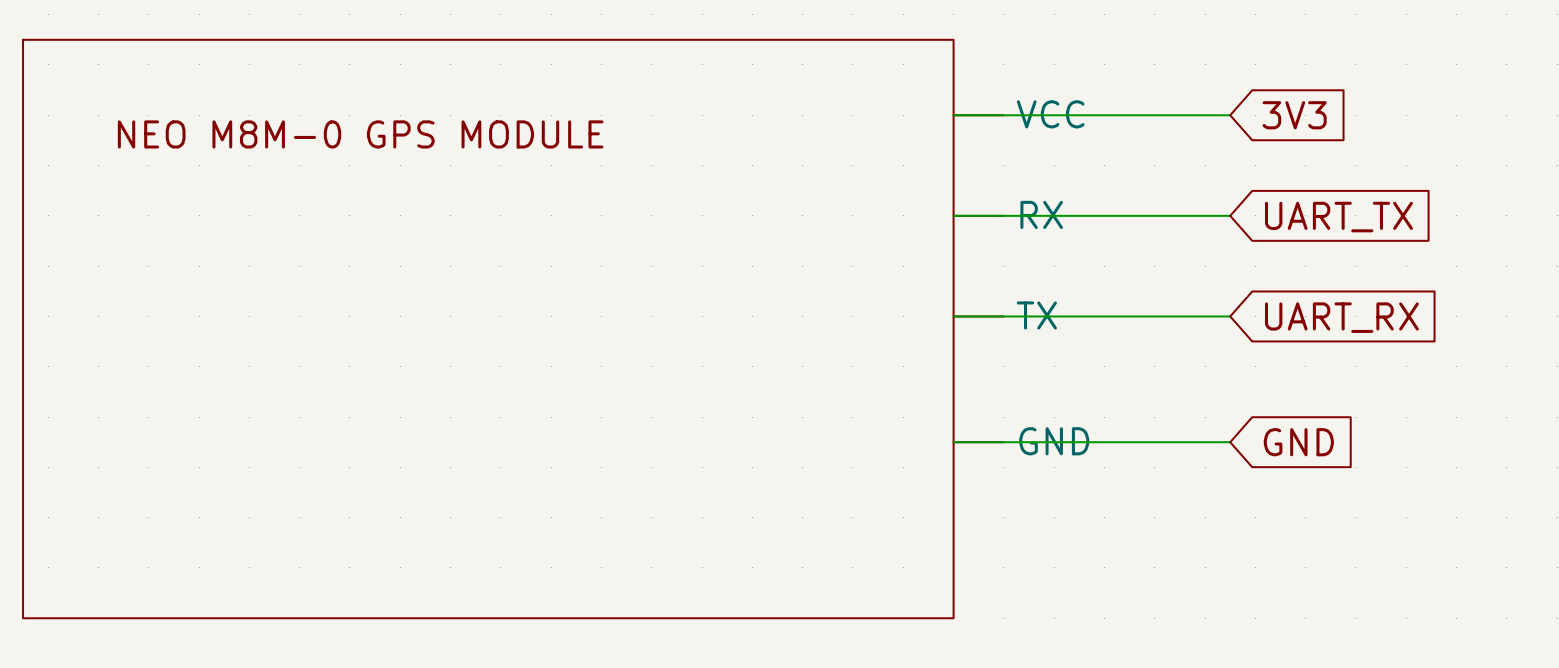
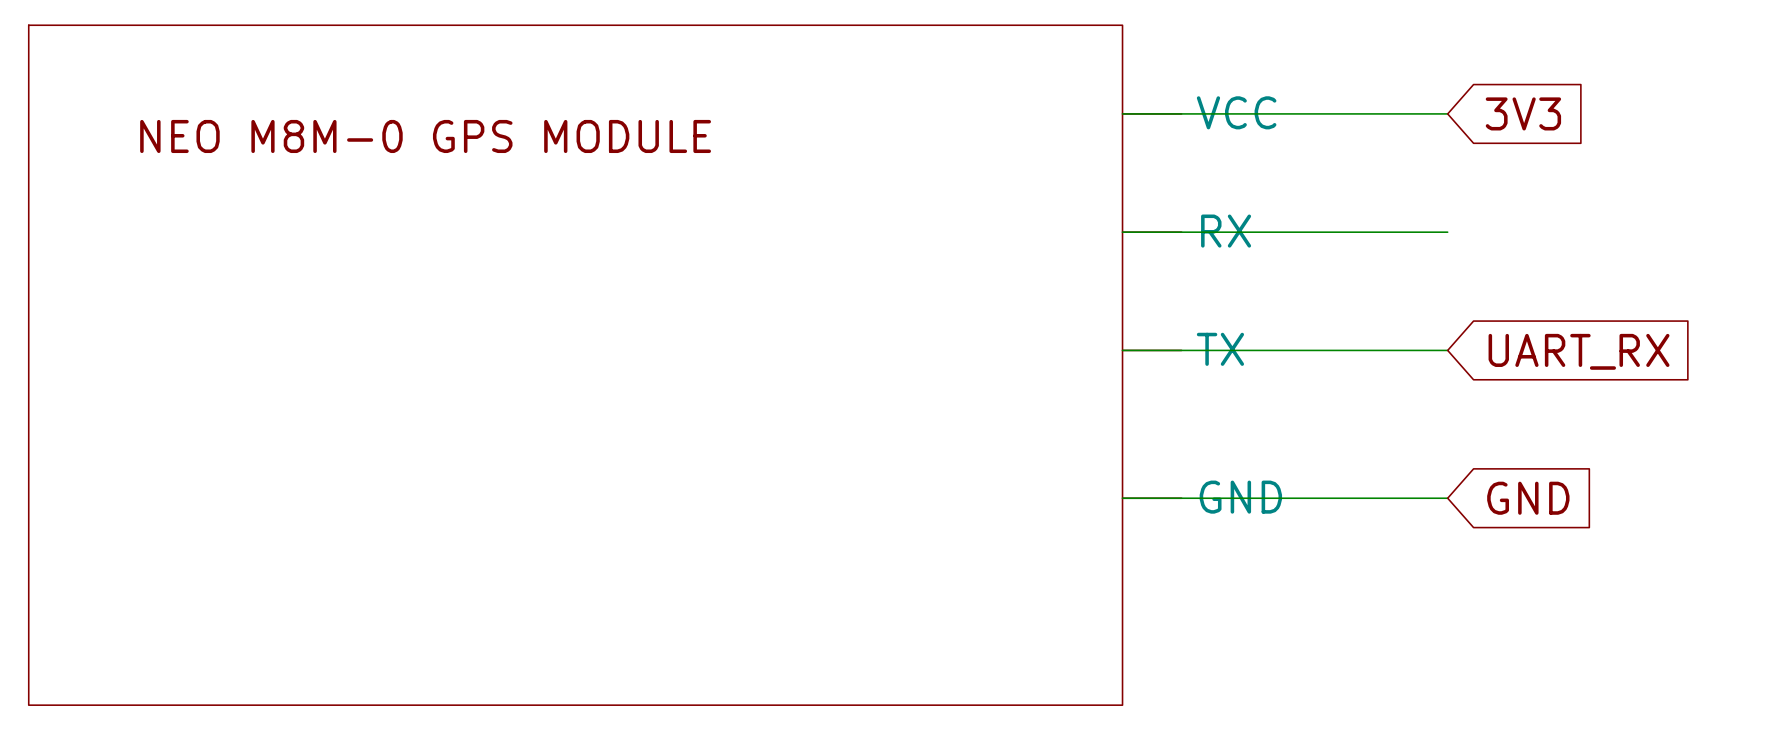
global label: UART_TX (1338, 217) -> none

